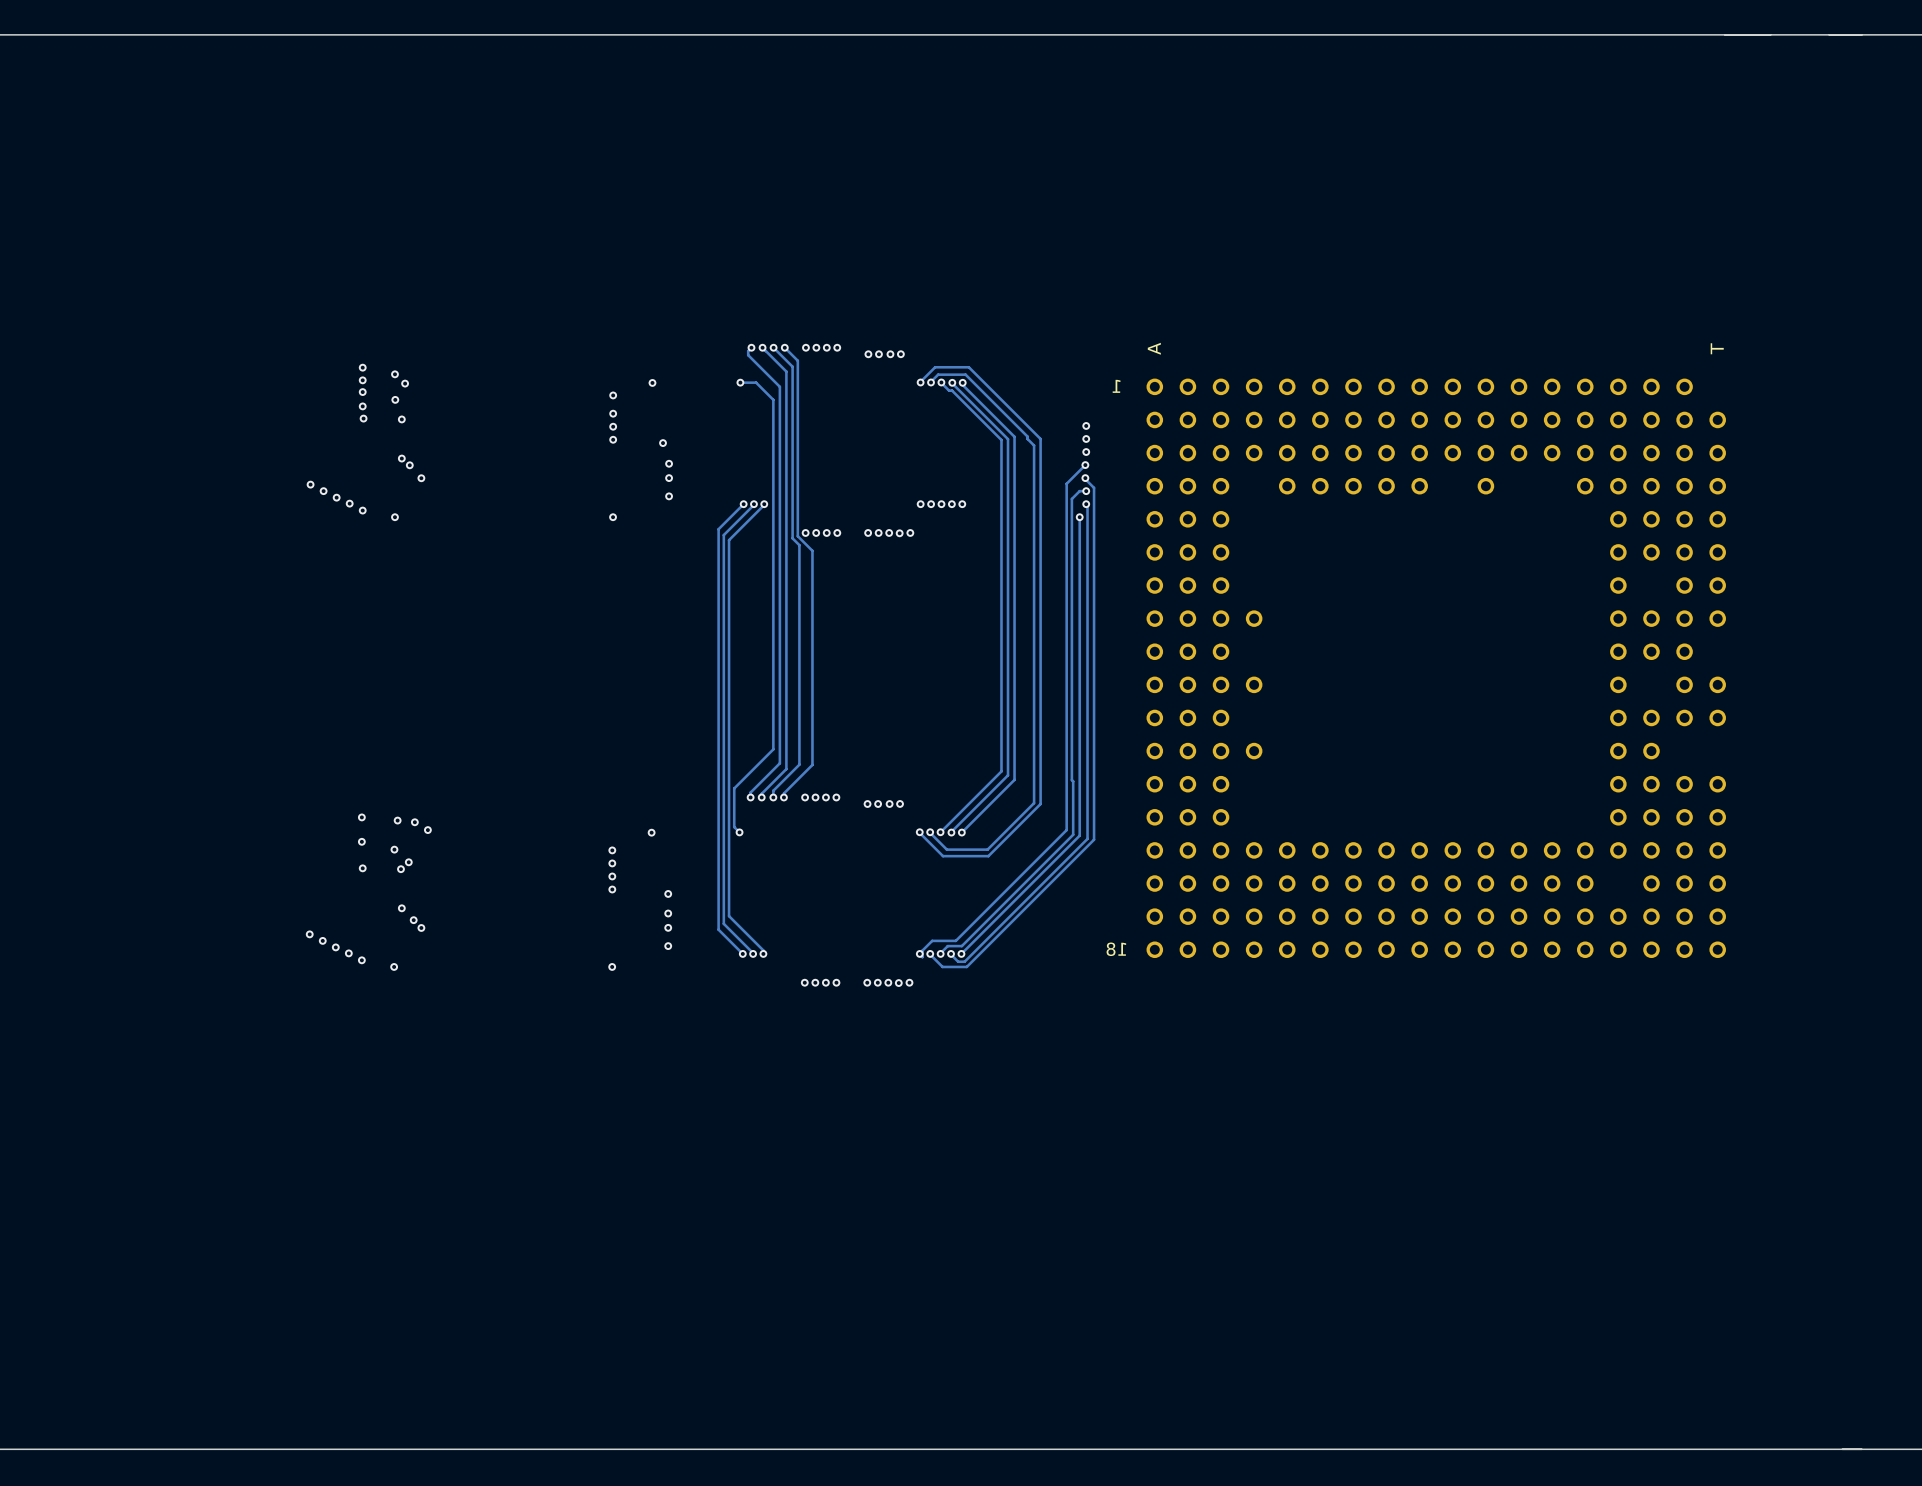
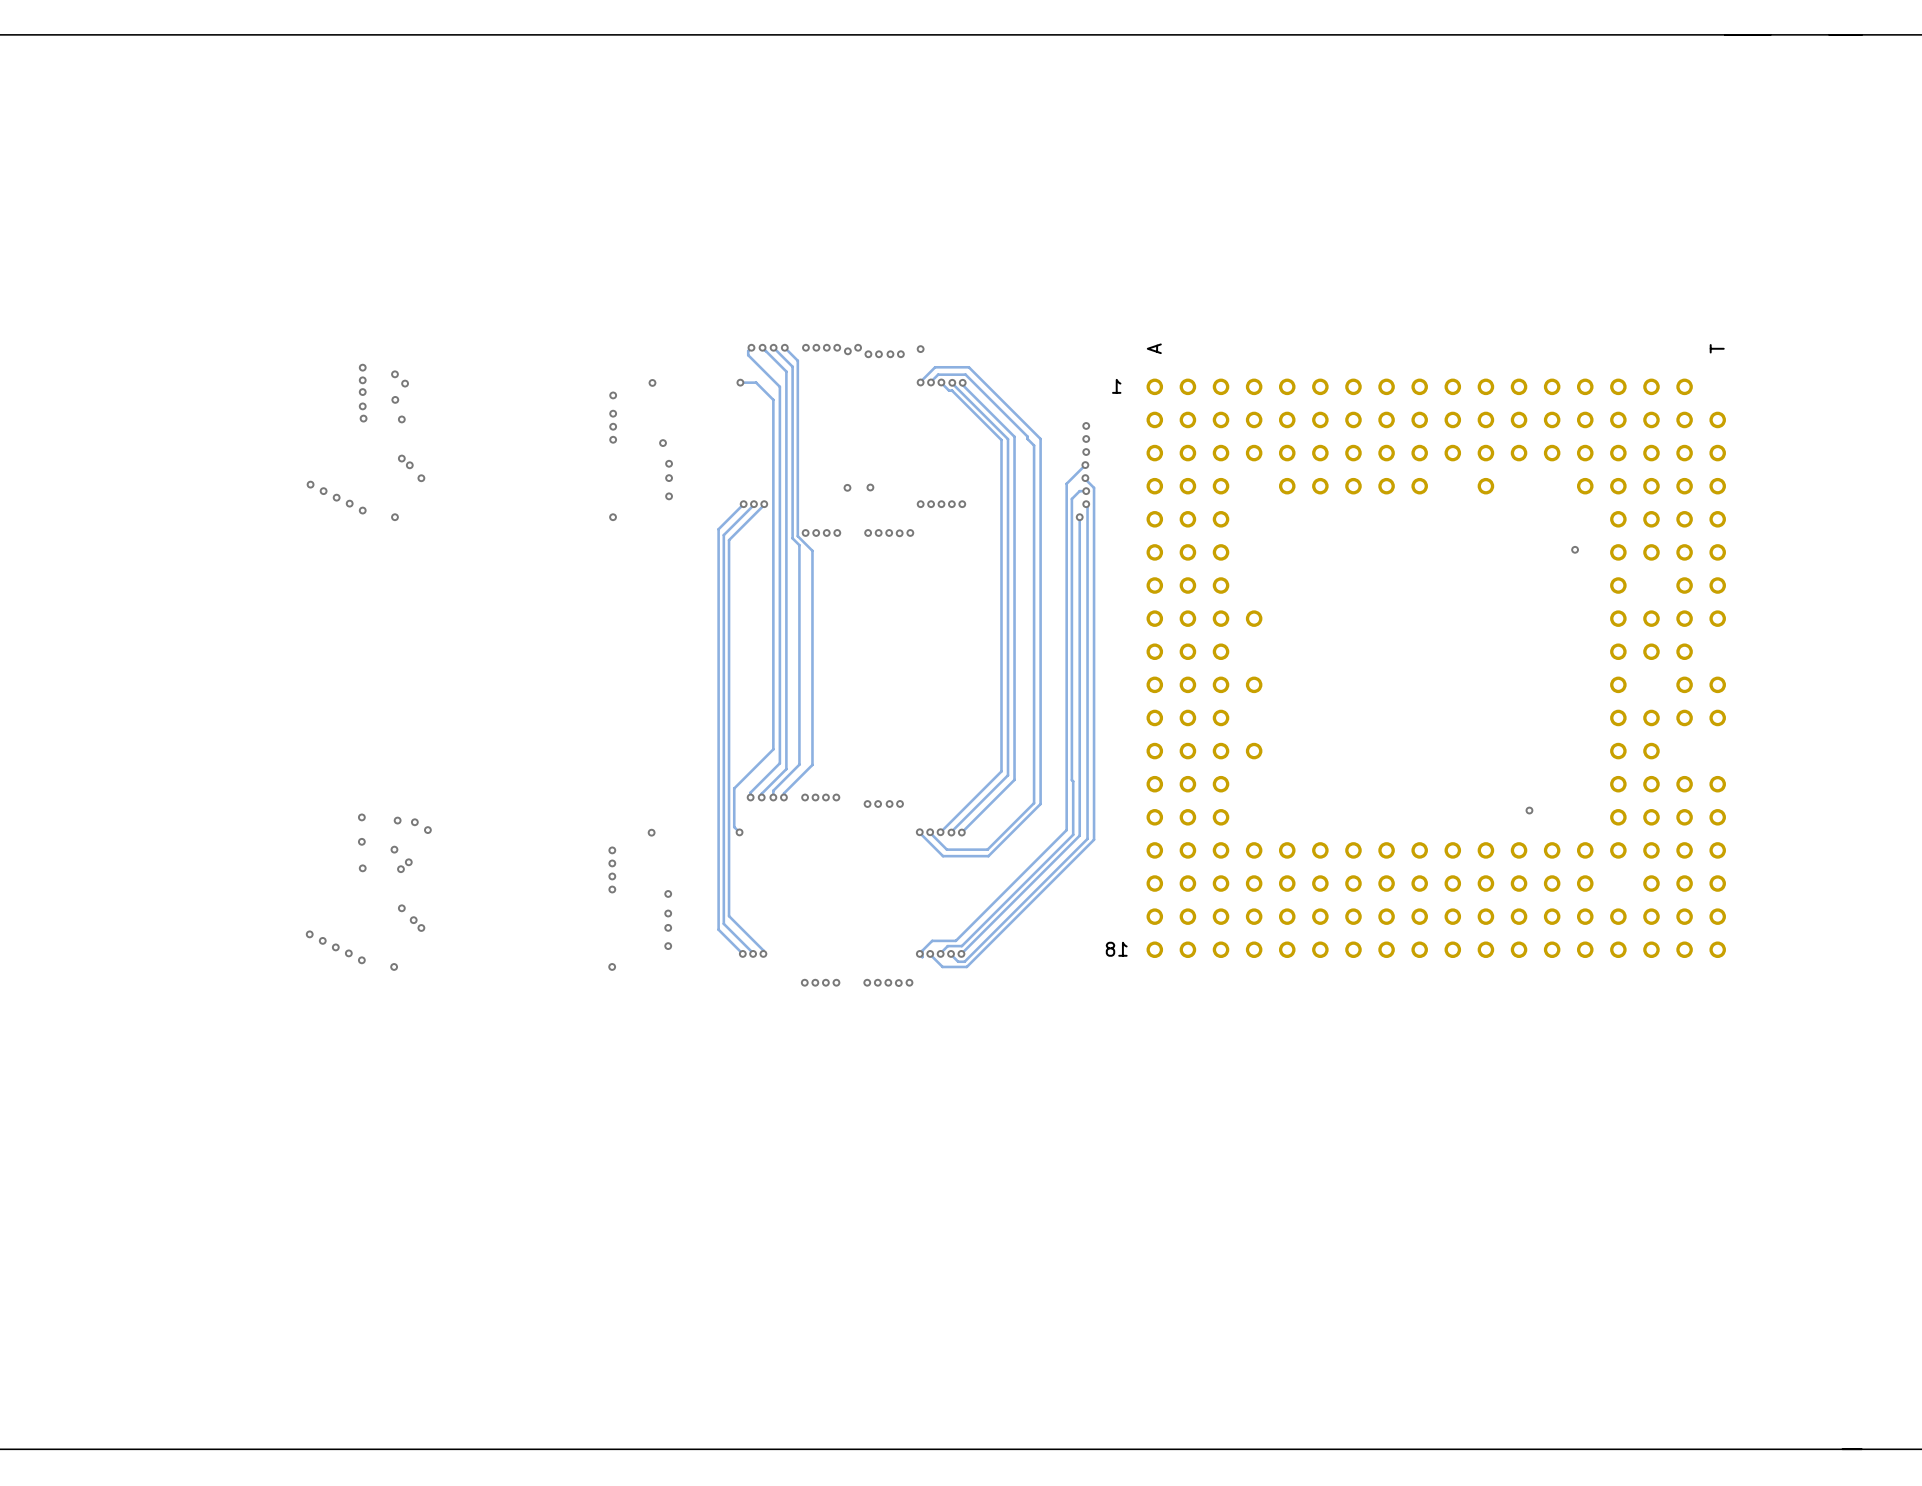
via: none -> (858, 347)
via: none -> (920, 349)
via: none -> (847, 351)
via: none -> (847, 487)
via: none -> (870, 487)
via: none -> (1575, 549)
via: none -> (1529, 810)

